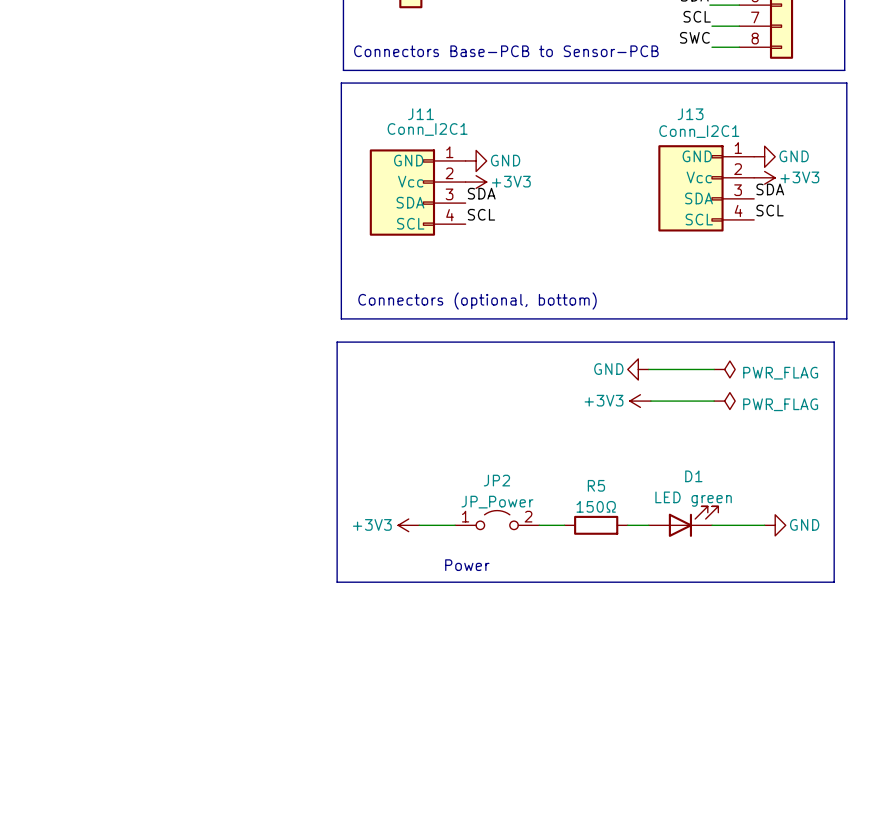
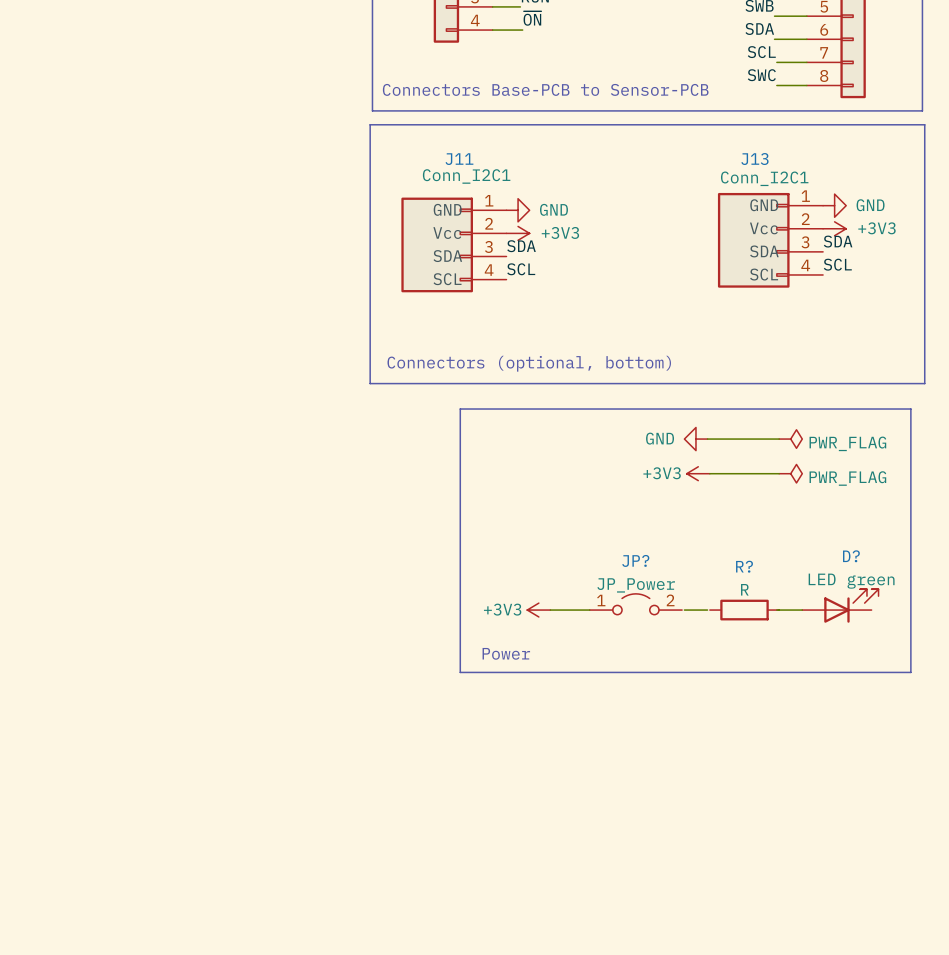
line: (423, 342) (337, 342) (337, 582) (423, 582) -> (460, 409) (460, 672)
JP2: JP_Power (497, 520) -> none
JP?: none -> JP_Power (635, 604)
D1: LED green (683, 521) -> none
D?: none -> LED green (840, 606)
power symbol position: +3V3 (408, 525) -> +3V3 (538, 610)
wire: (419, 525) (455, 525) -> none
R5: 150Ω (596, 525) -> none
R?: none -> R (744, 610)
power symbol: GND (775, 525) -> none

